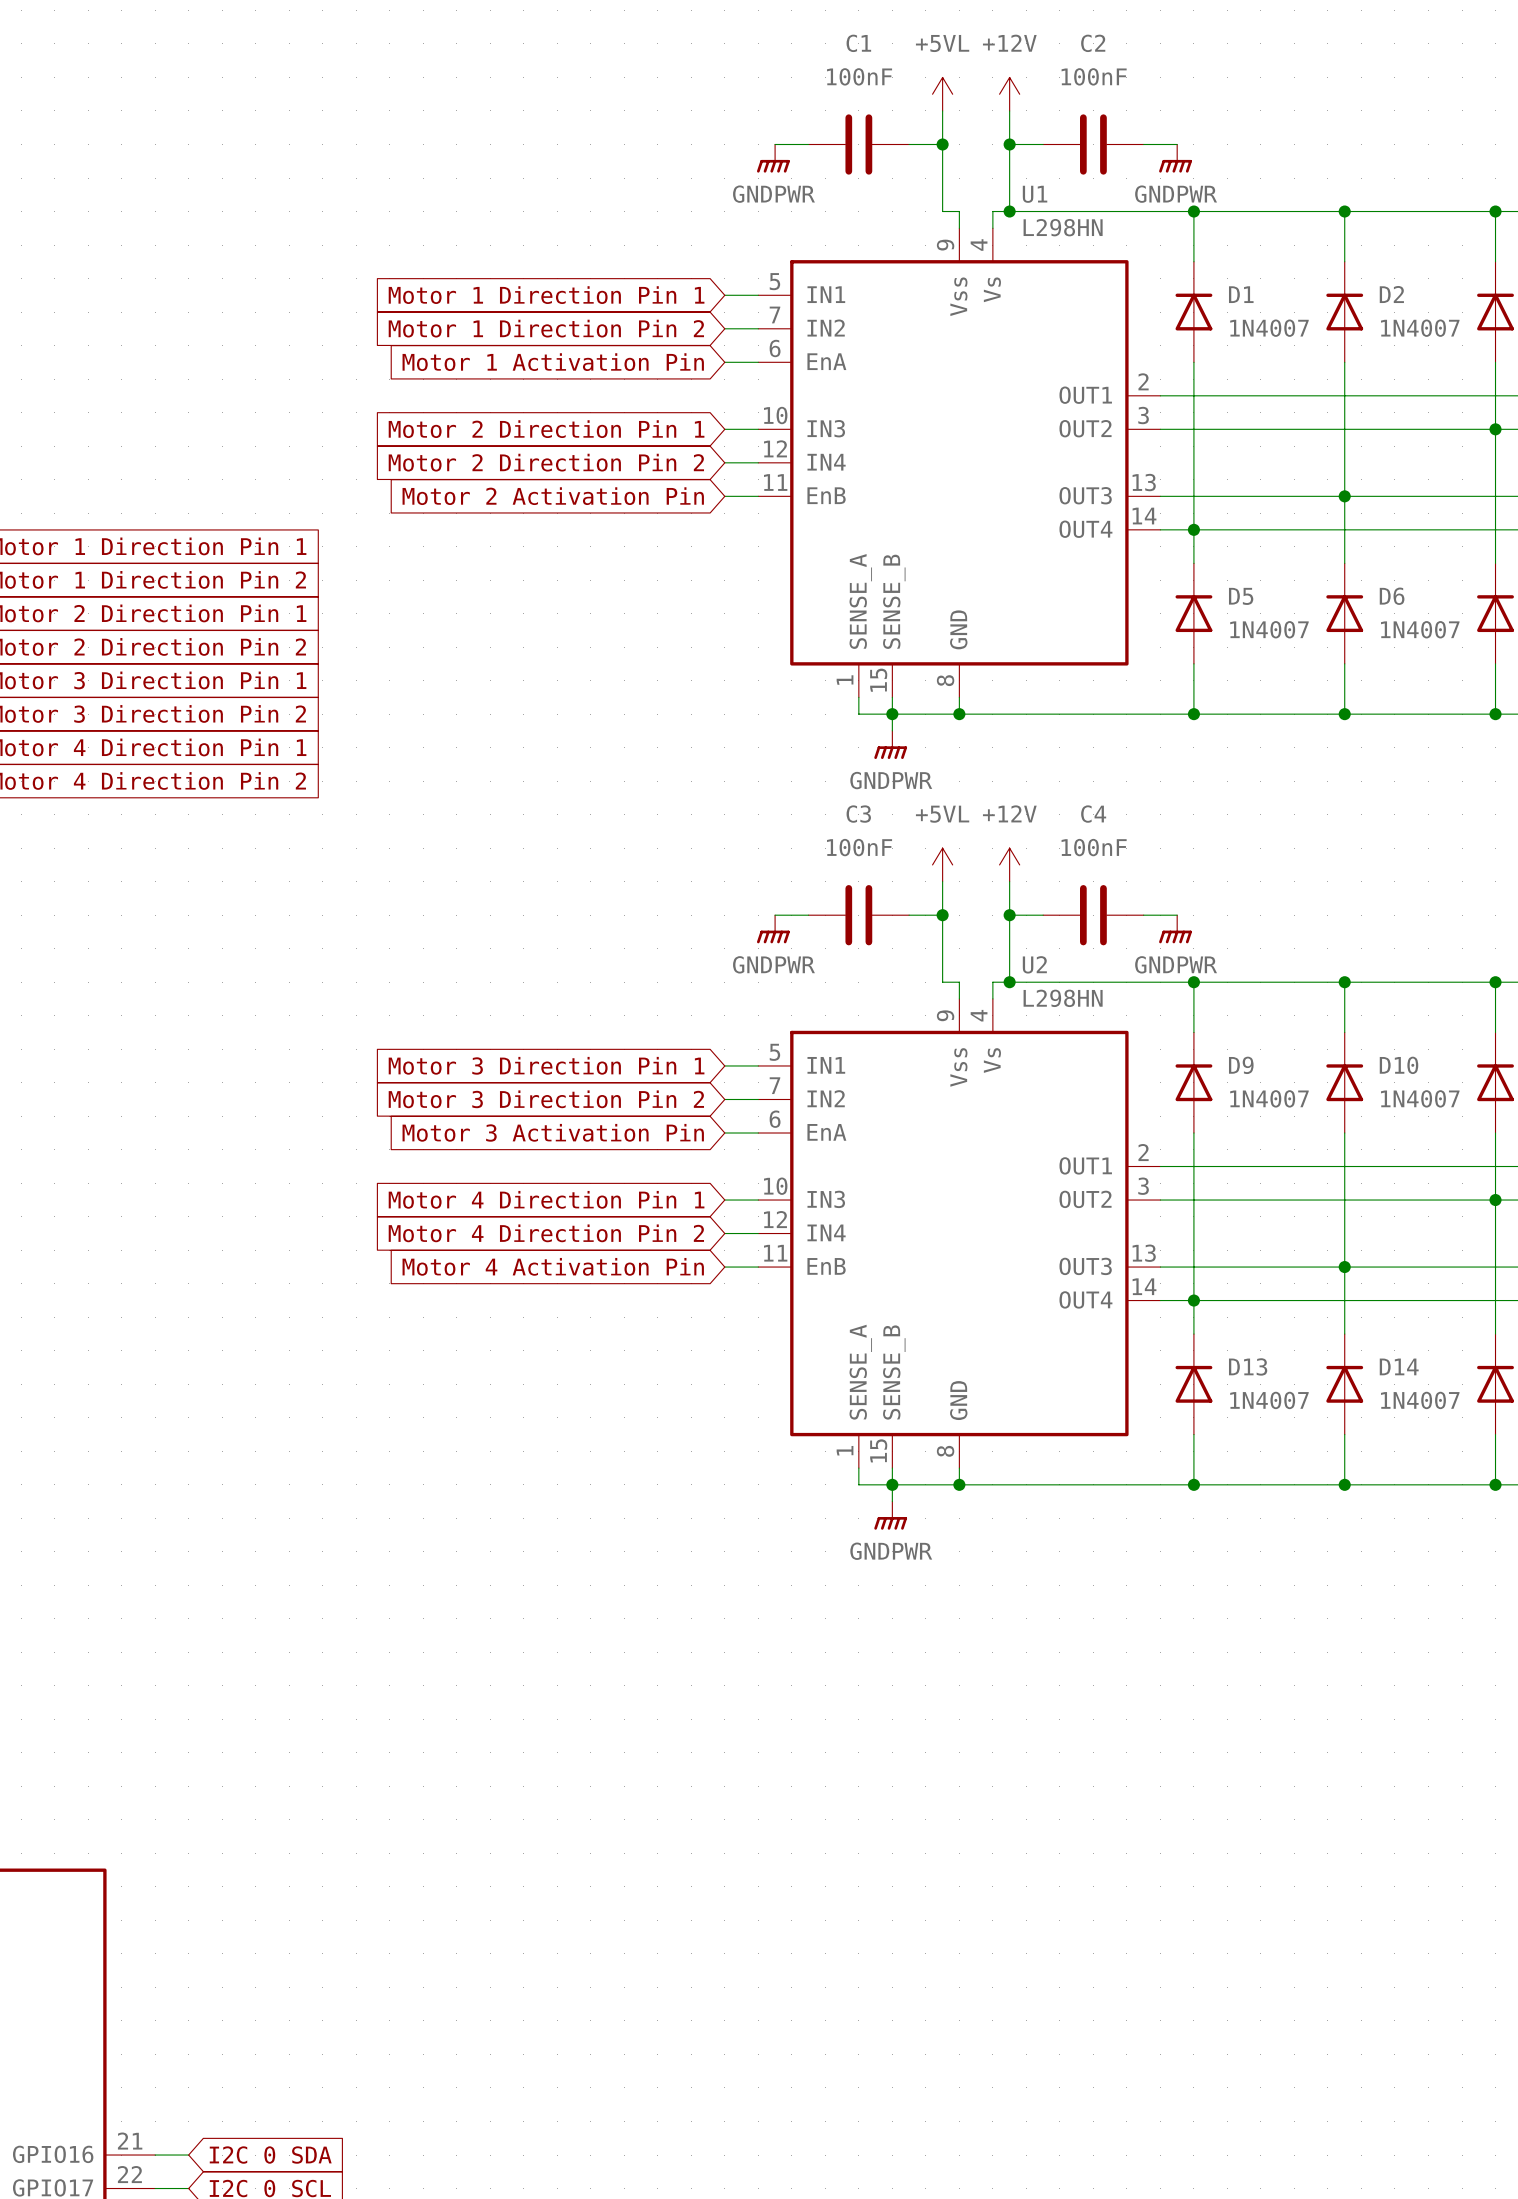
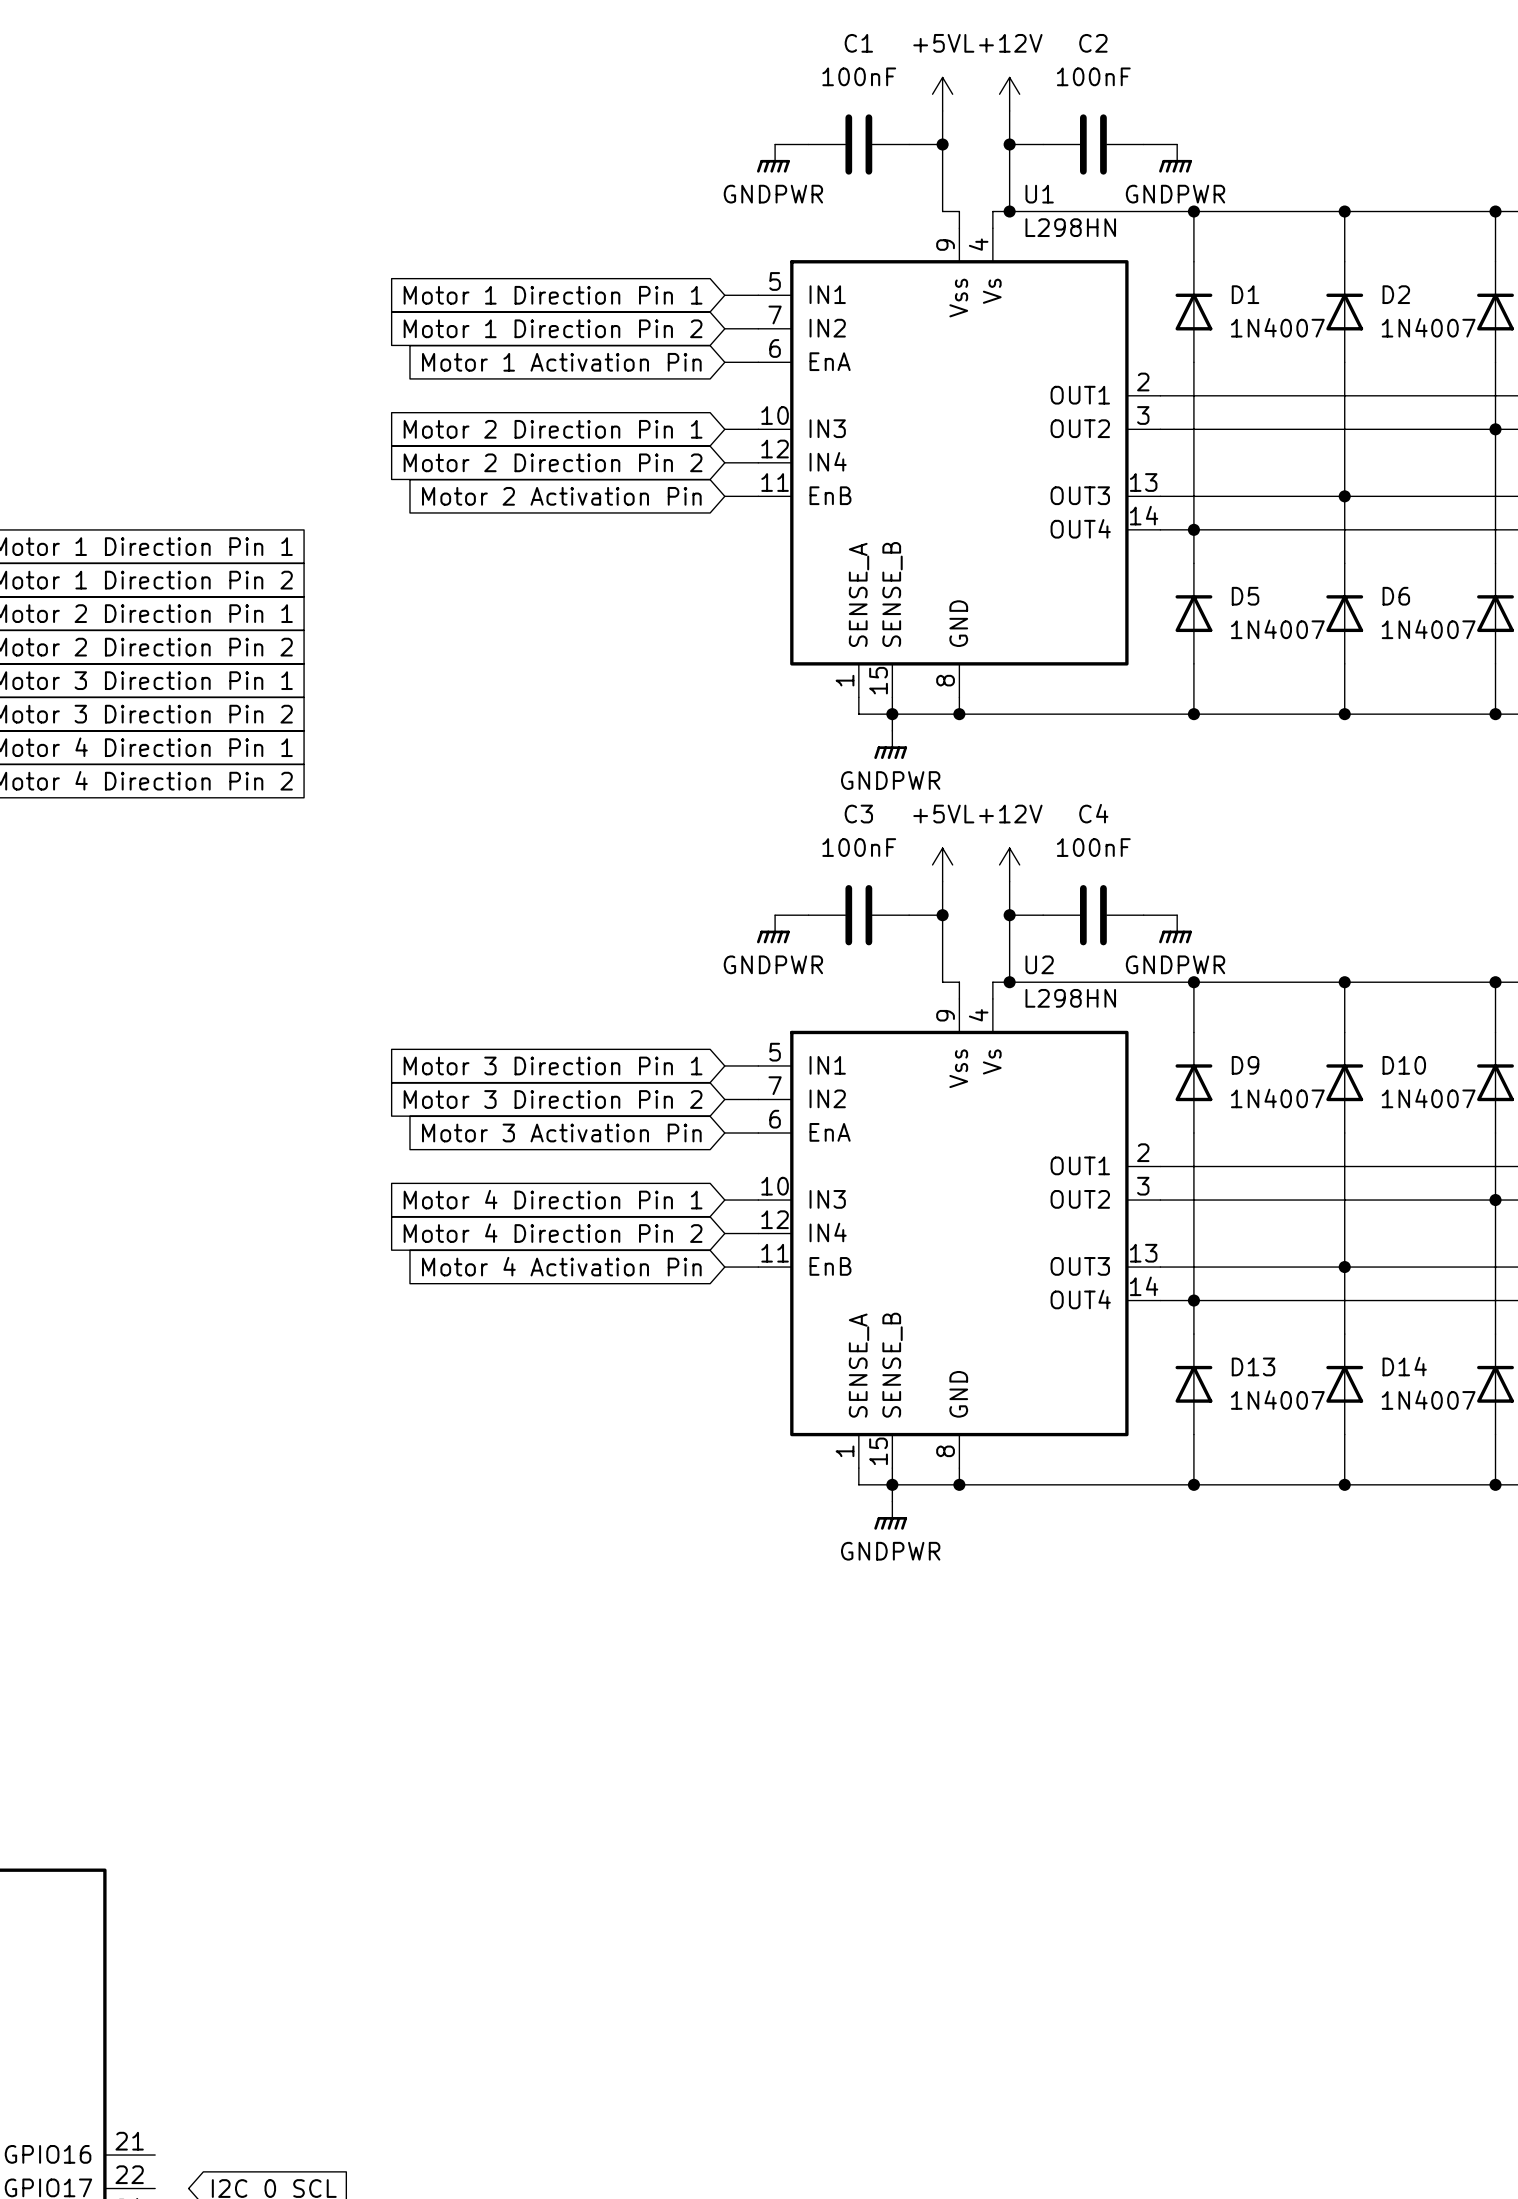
wire: (155, 2155) (188, 2155) -> none
global label: I2C 0 SDA (270, 2155) -> none
wire: (155, 2188) (188, 2188) -> none

